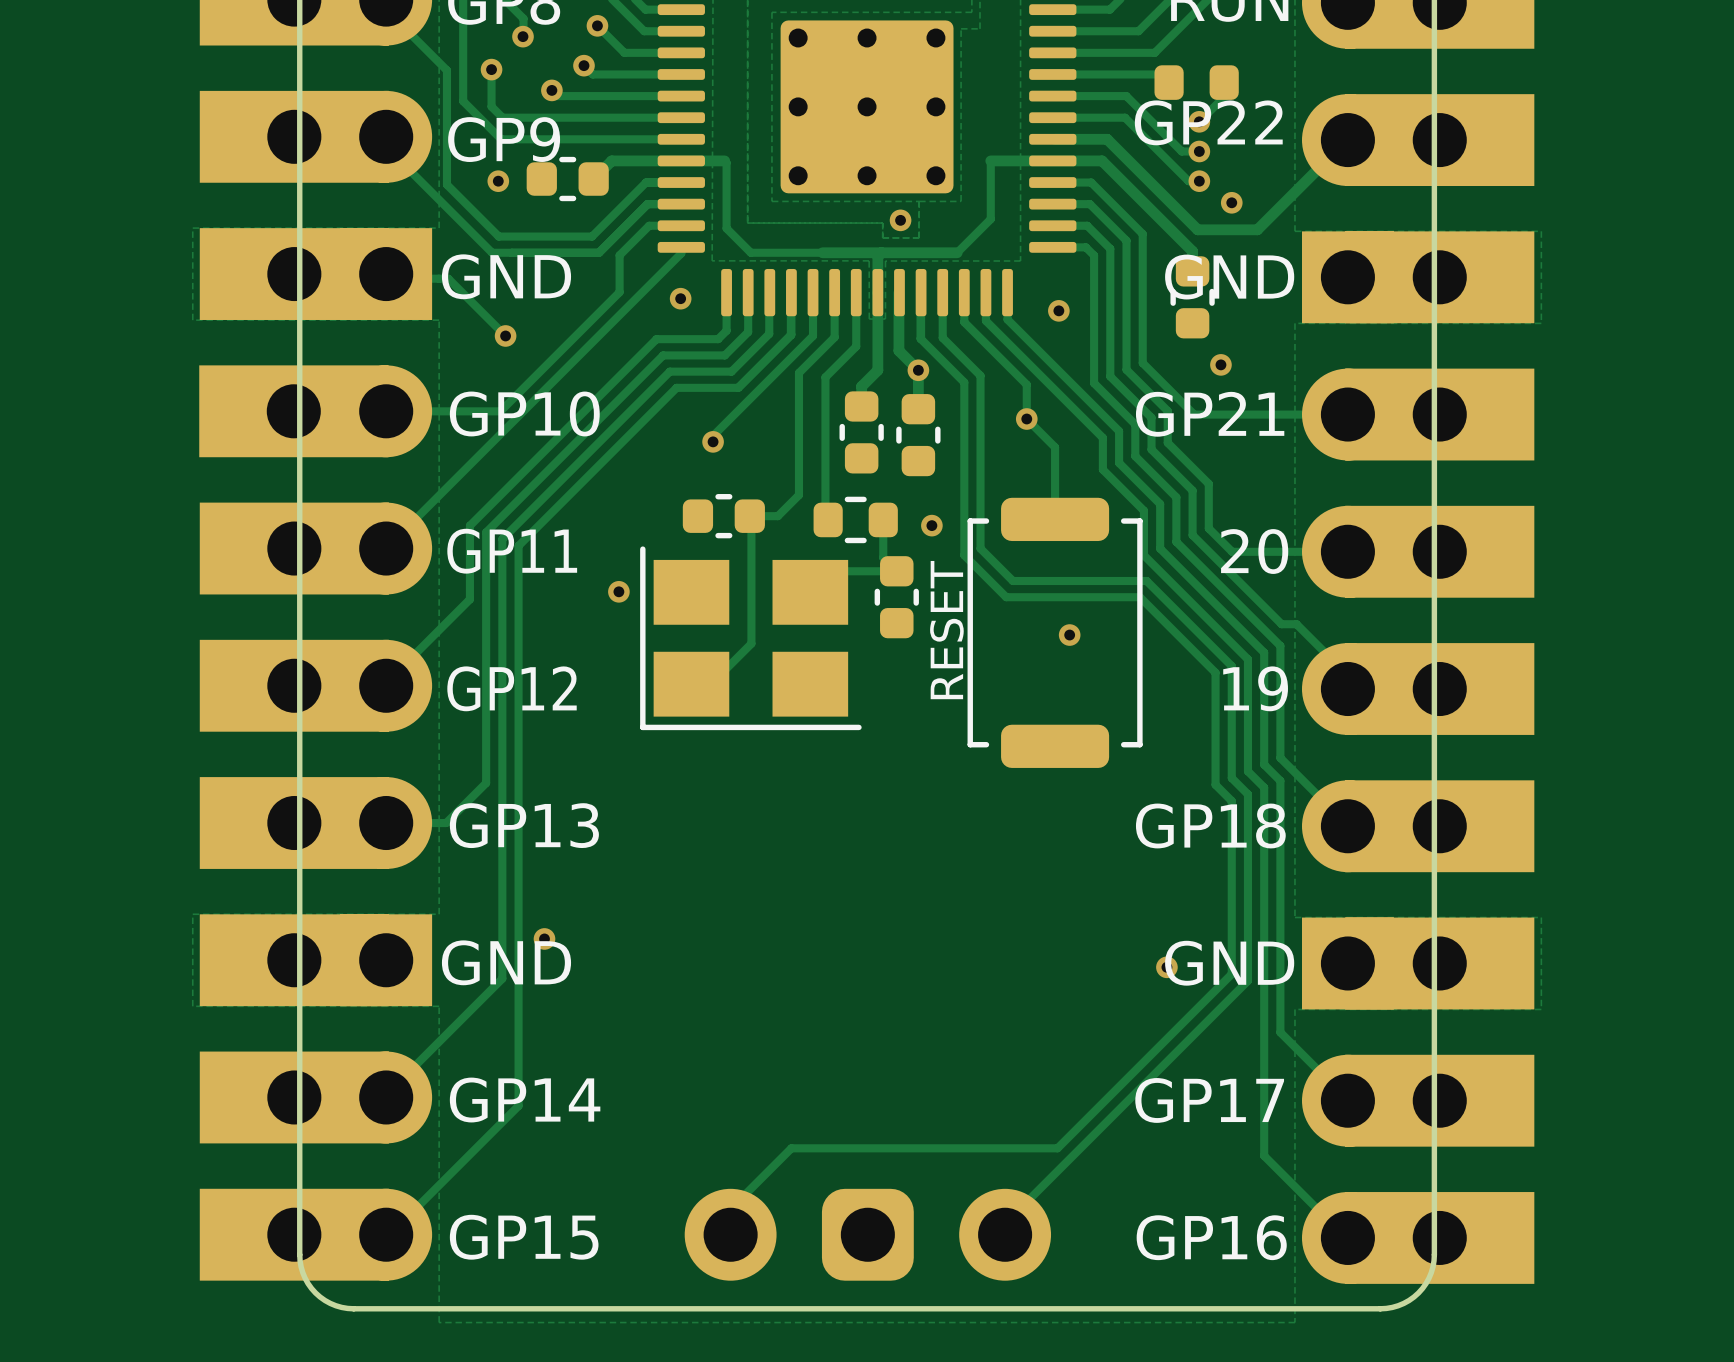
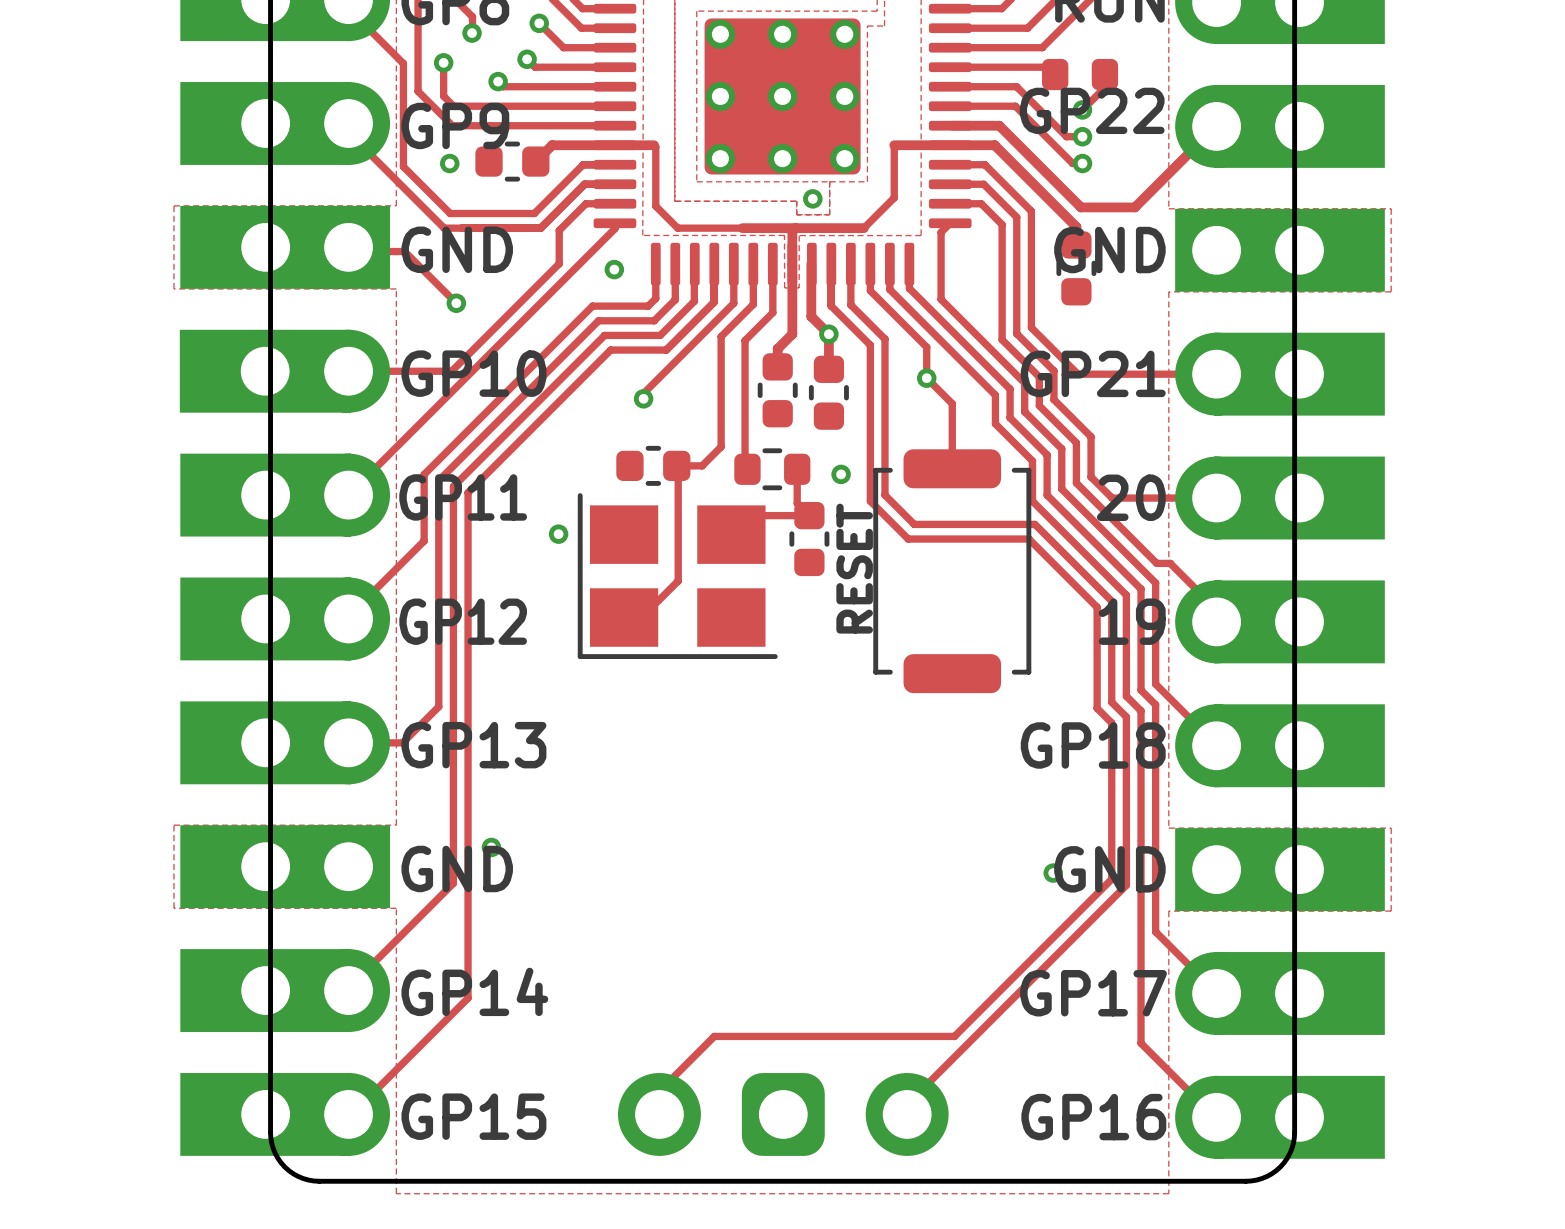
via: (1231, 202) -> none
track: (1052, 247) (1085, 247) (1094, 255) (1094, 383) -> (950, 223) (941, 232) (941, 299) (987, 345)
via: (1058, 310) -> none
via: (1220, 364) -> none
via: (1069, 635) -> none

